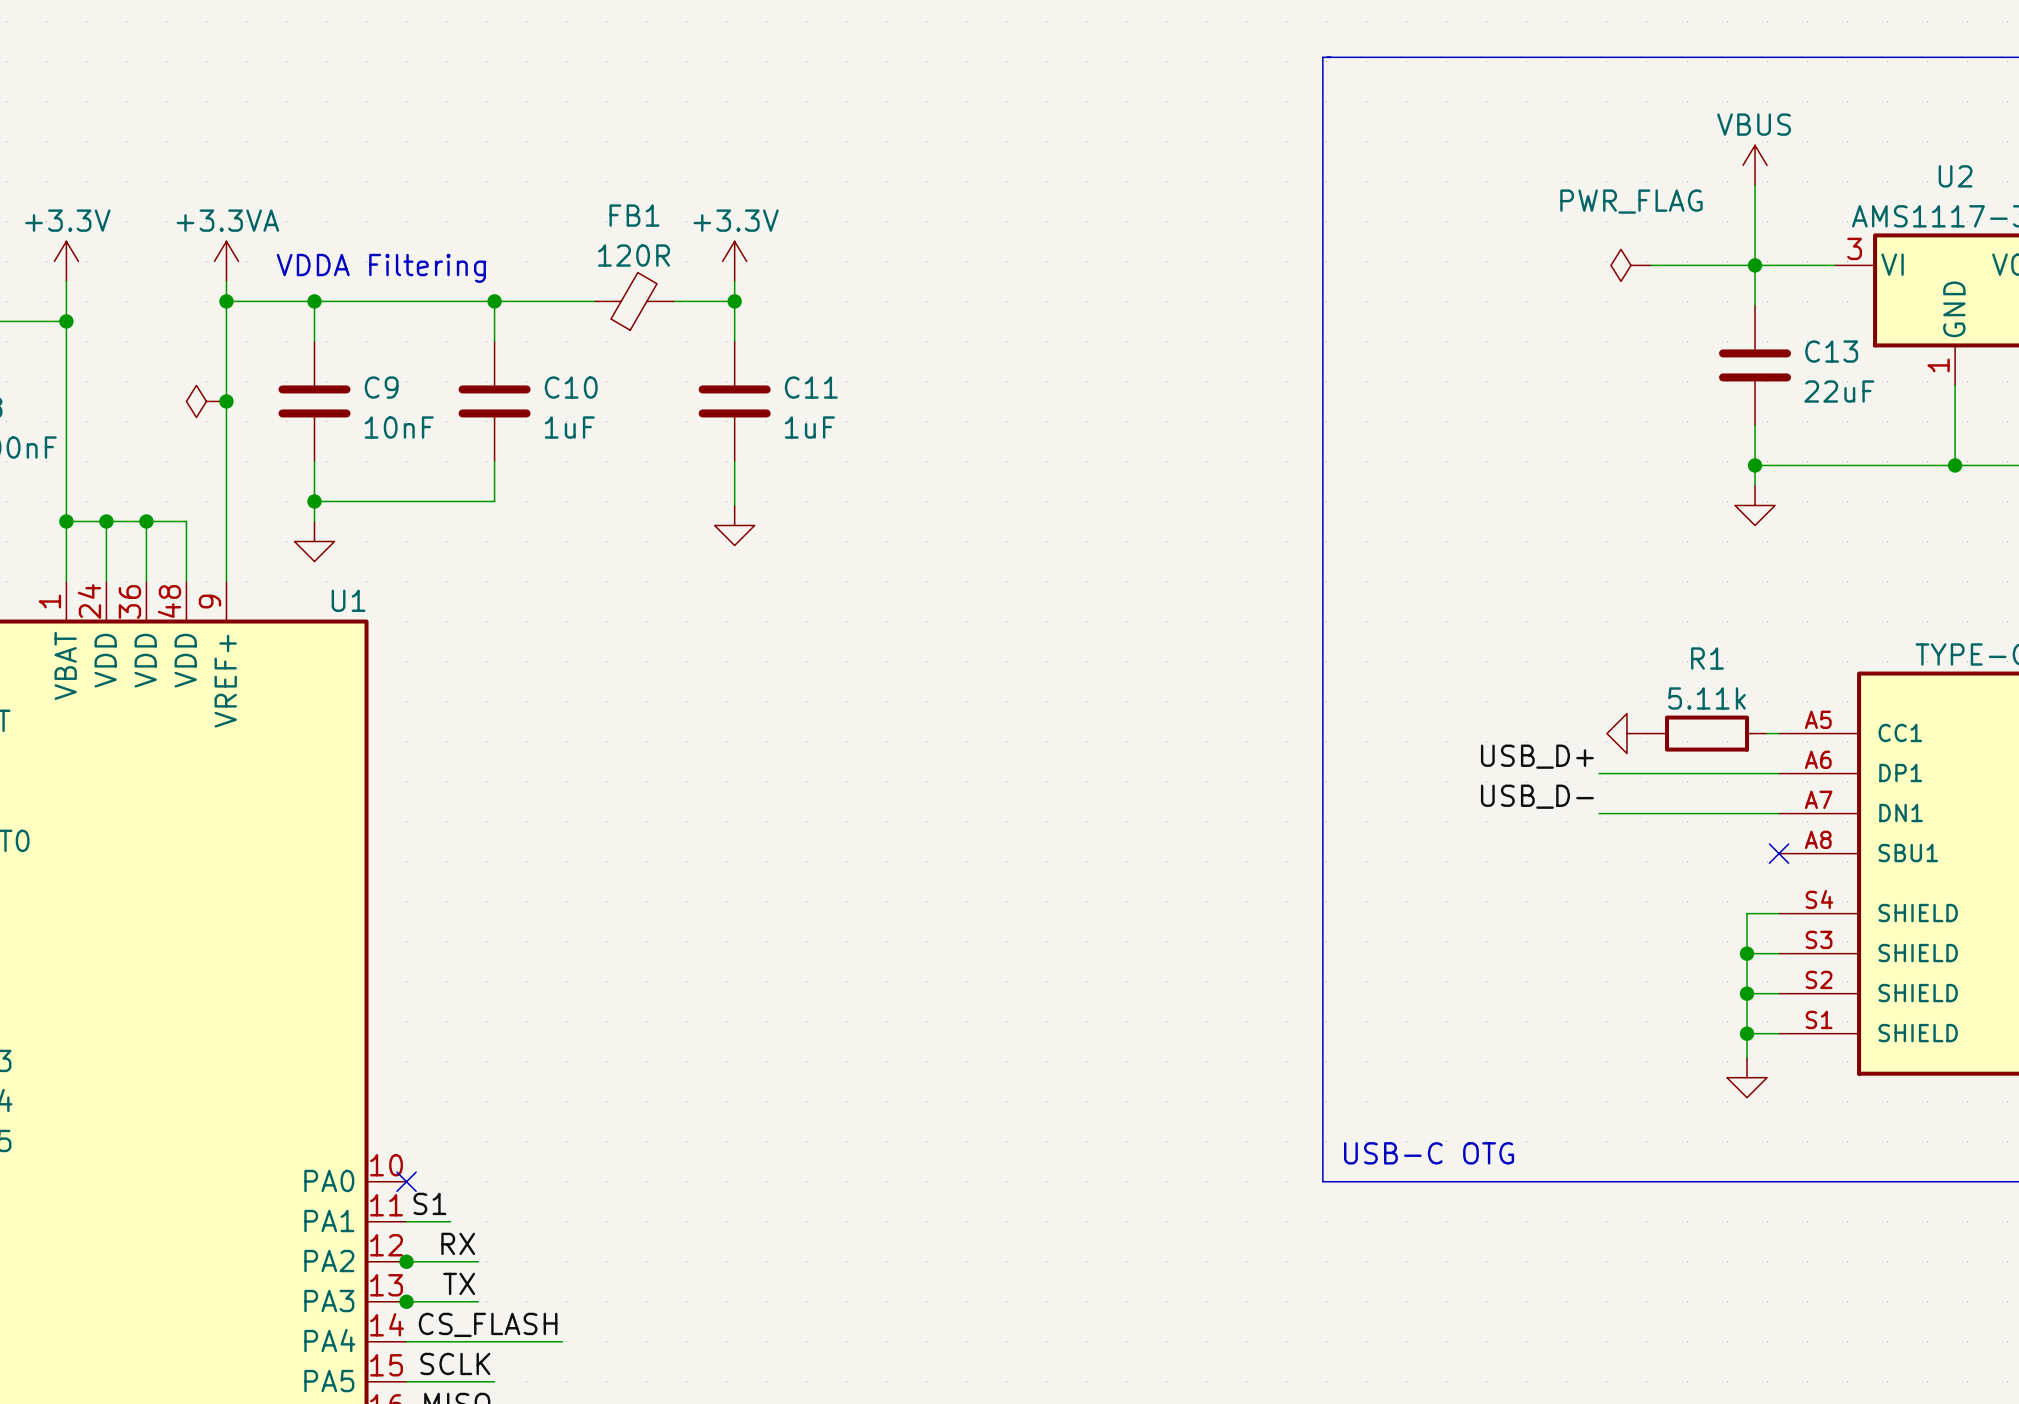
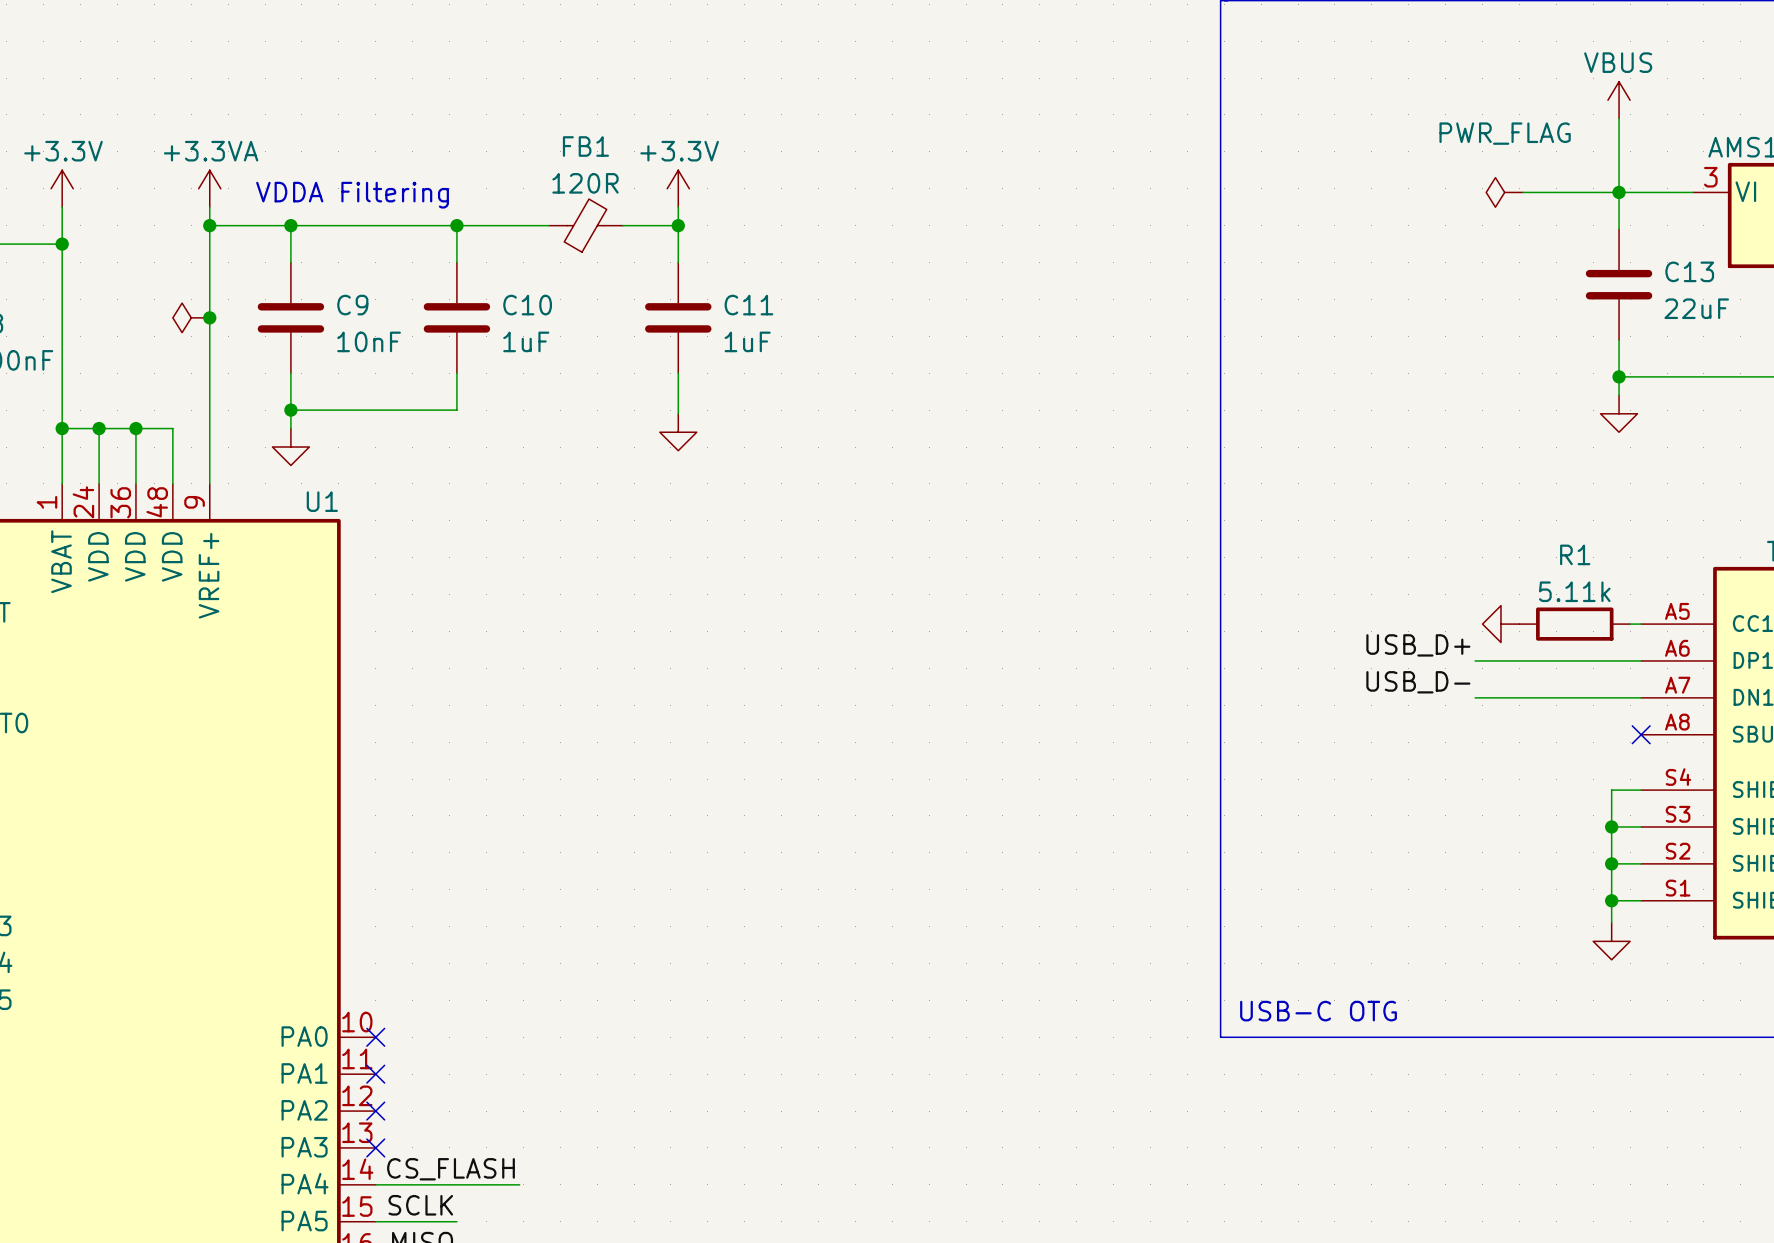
label: S1 (429, 1203) -> none
wire: (406, 1221) (450, 1221) -> none
no-connect mark: none -> (375, 1074)
label: RX (458, 1243) -> none
wire: (406, 1261) (478, 1261) -> none
junction: (406, 1261) -> none
no-connect mark: none -> (375, 1111)
label: TX (459, 1283) -> none
wire: (406, 1301) (478, 1301) -> none
junction: (406, 1301) -> none
no-connect mark: none -> (375, 1147)

